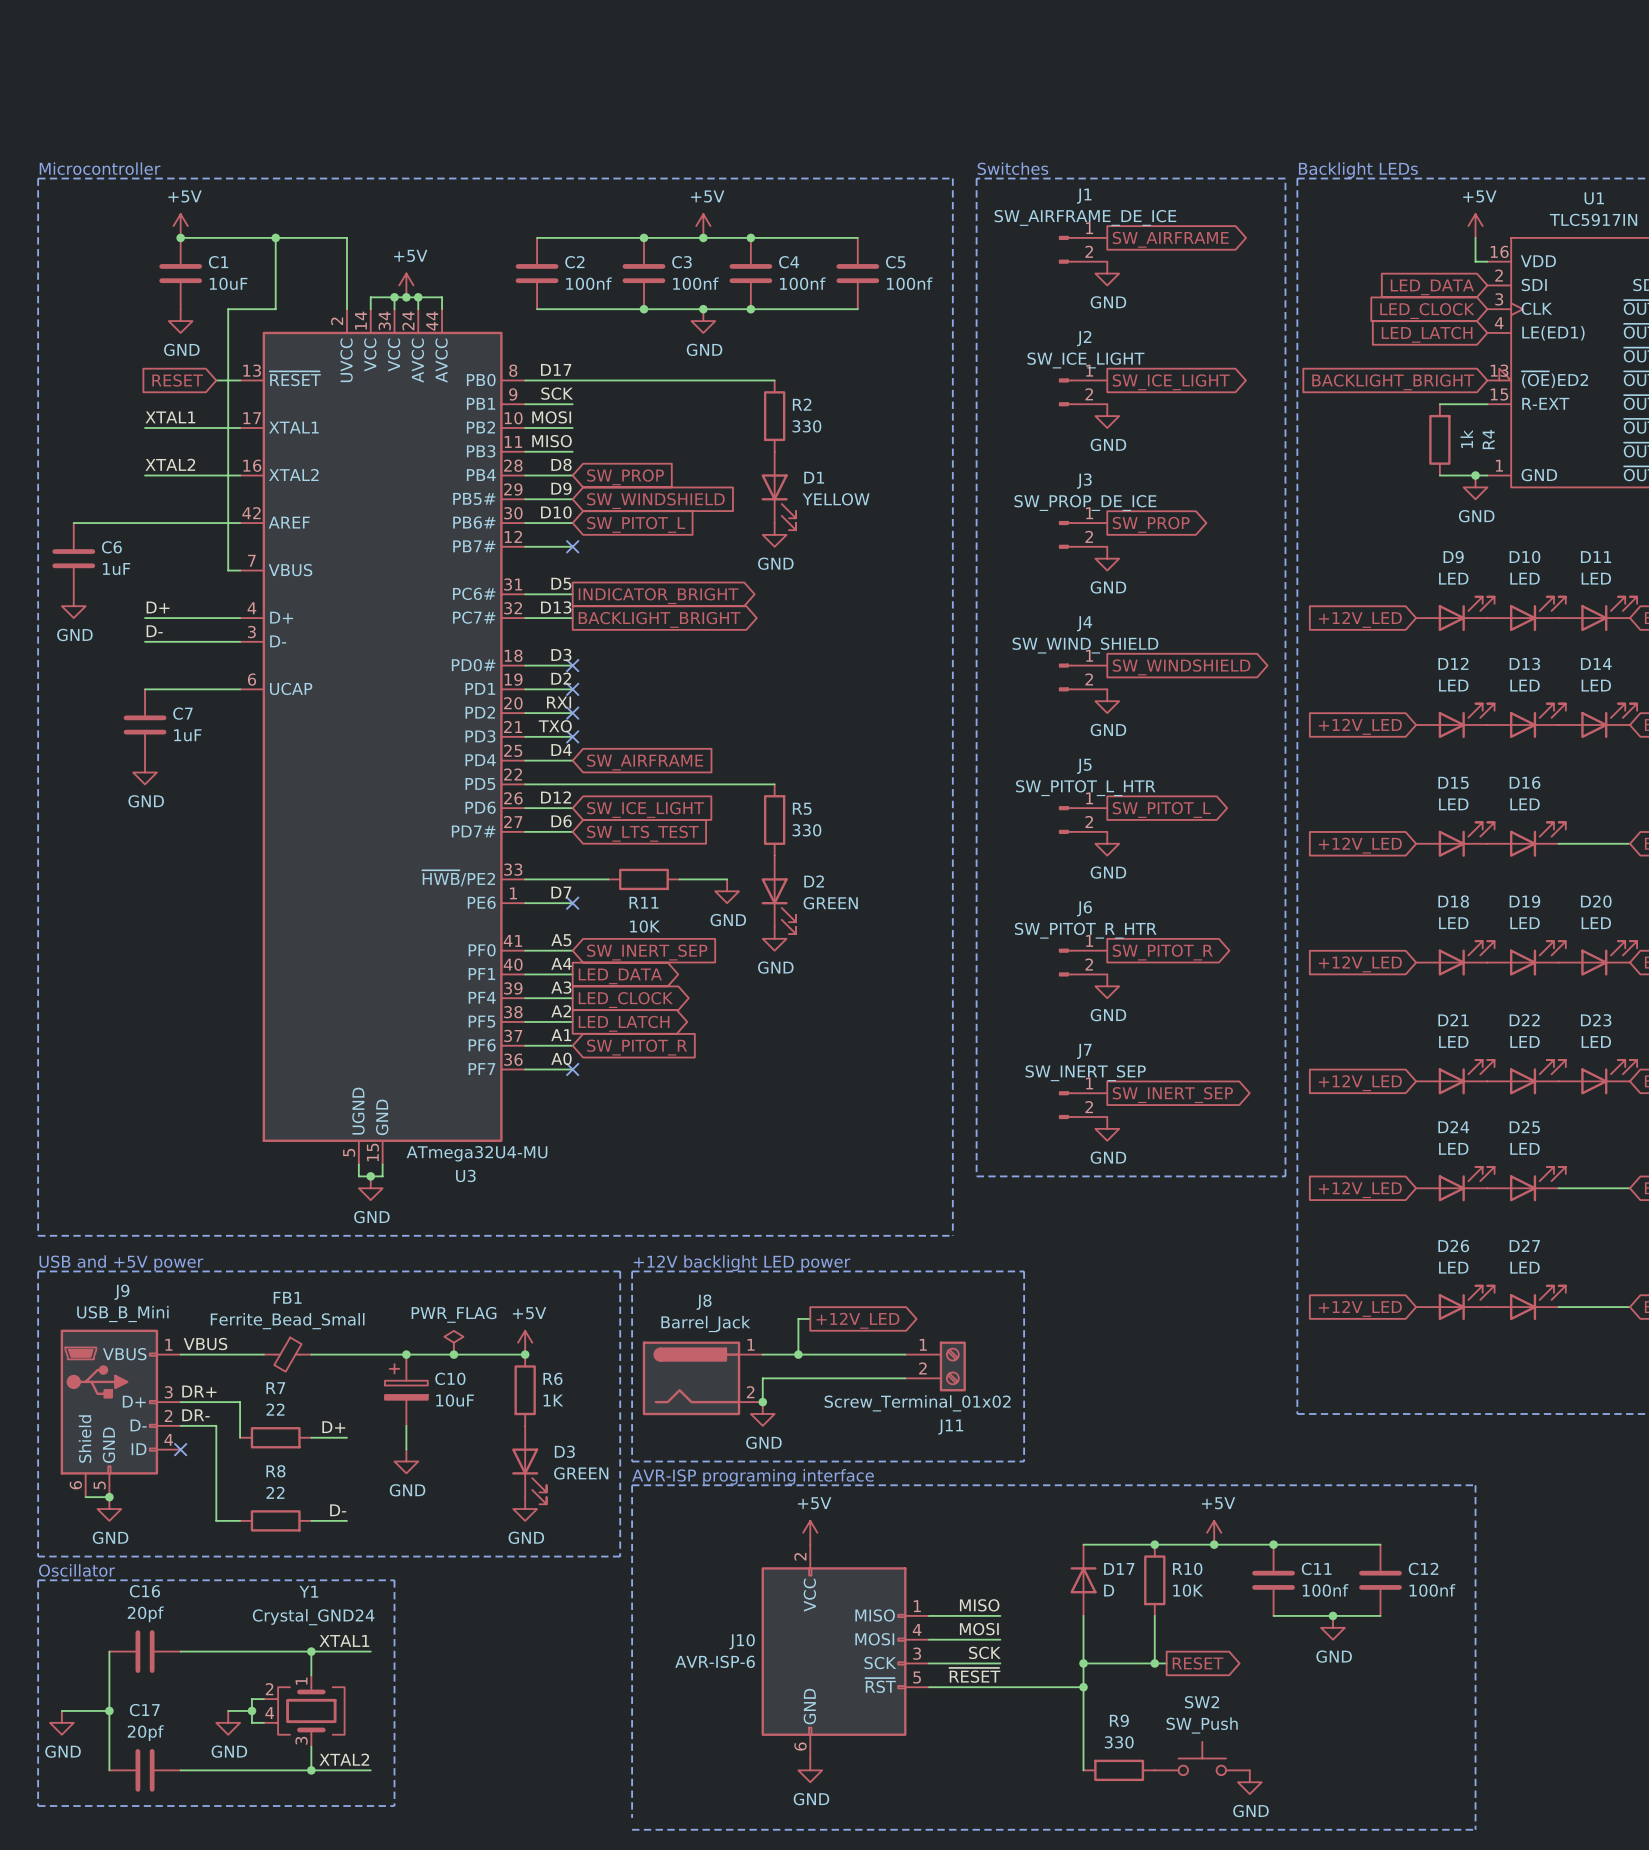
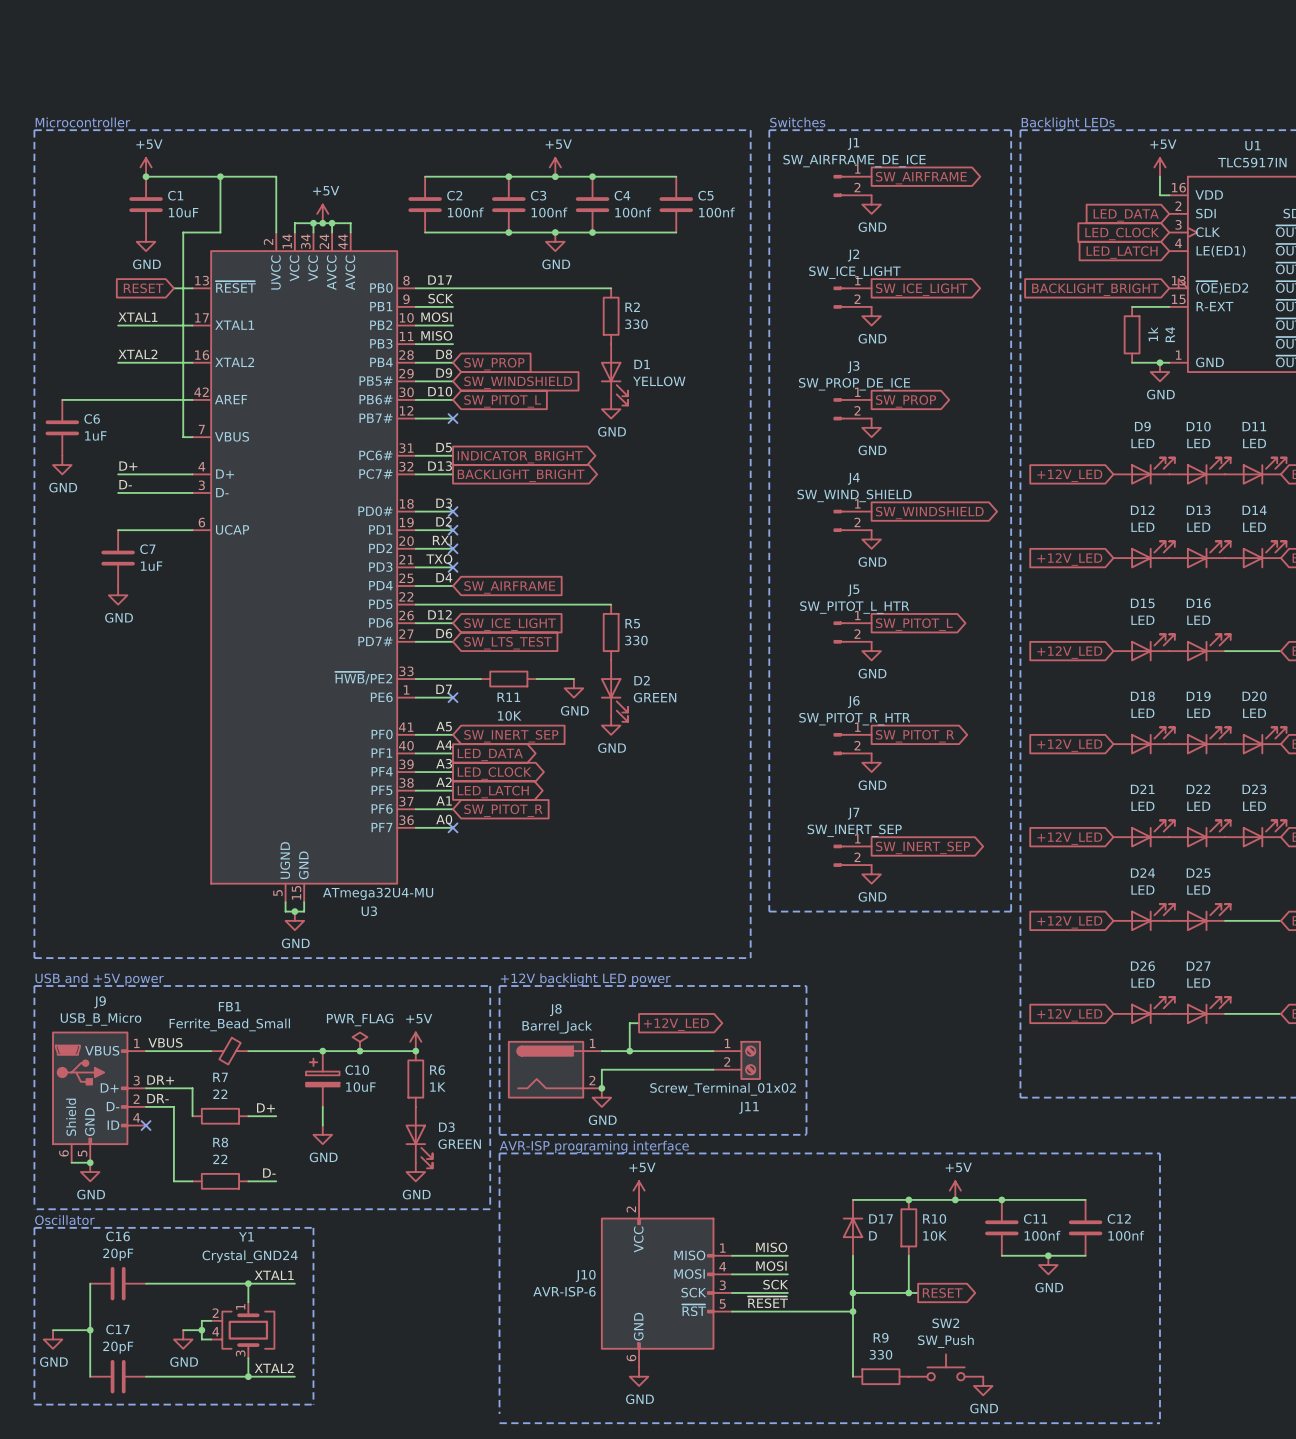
J9 value: USB_B_Mini (122, 1314) -> USB_B_Micro (101, 1019)
C16 value: 20pf (145, 1614) -> 20pF (118, 1254)
C17 value: 20pf (145, 1733) -> 20pF (118, 1347)

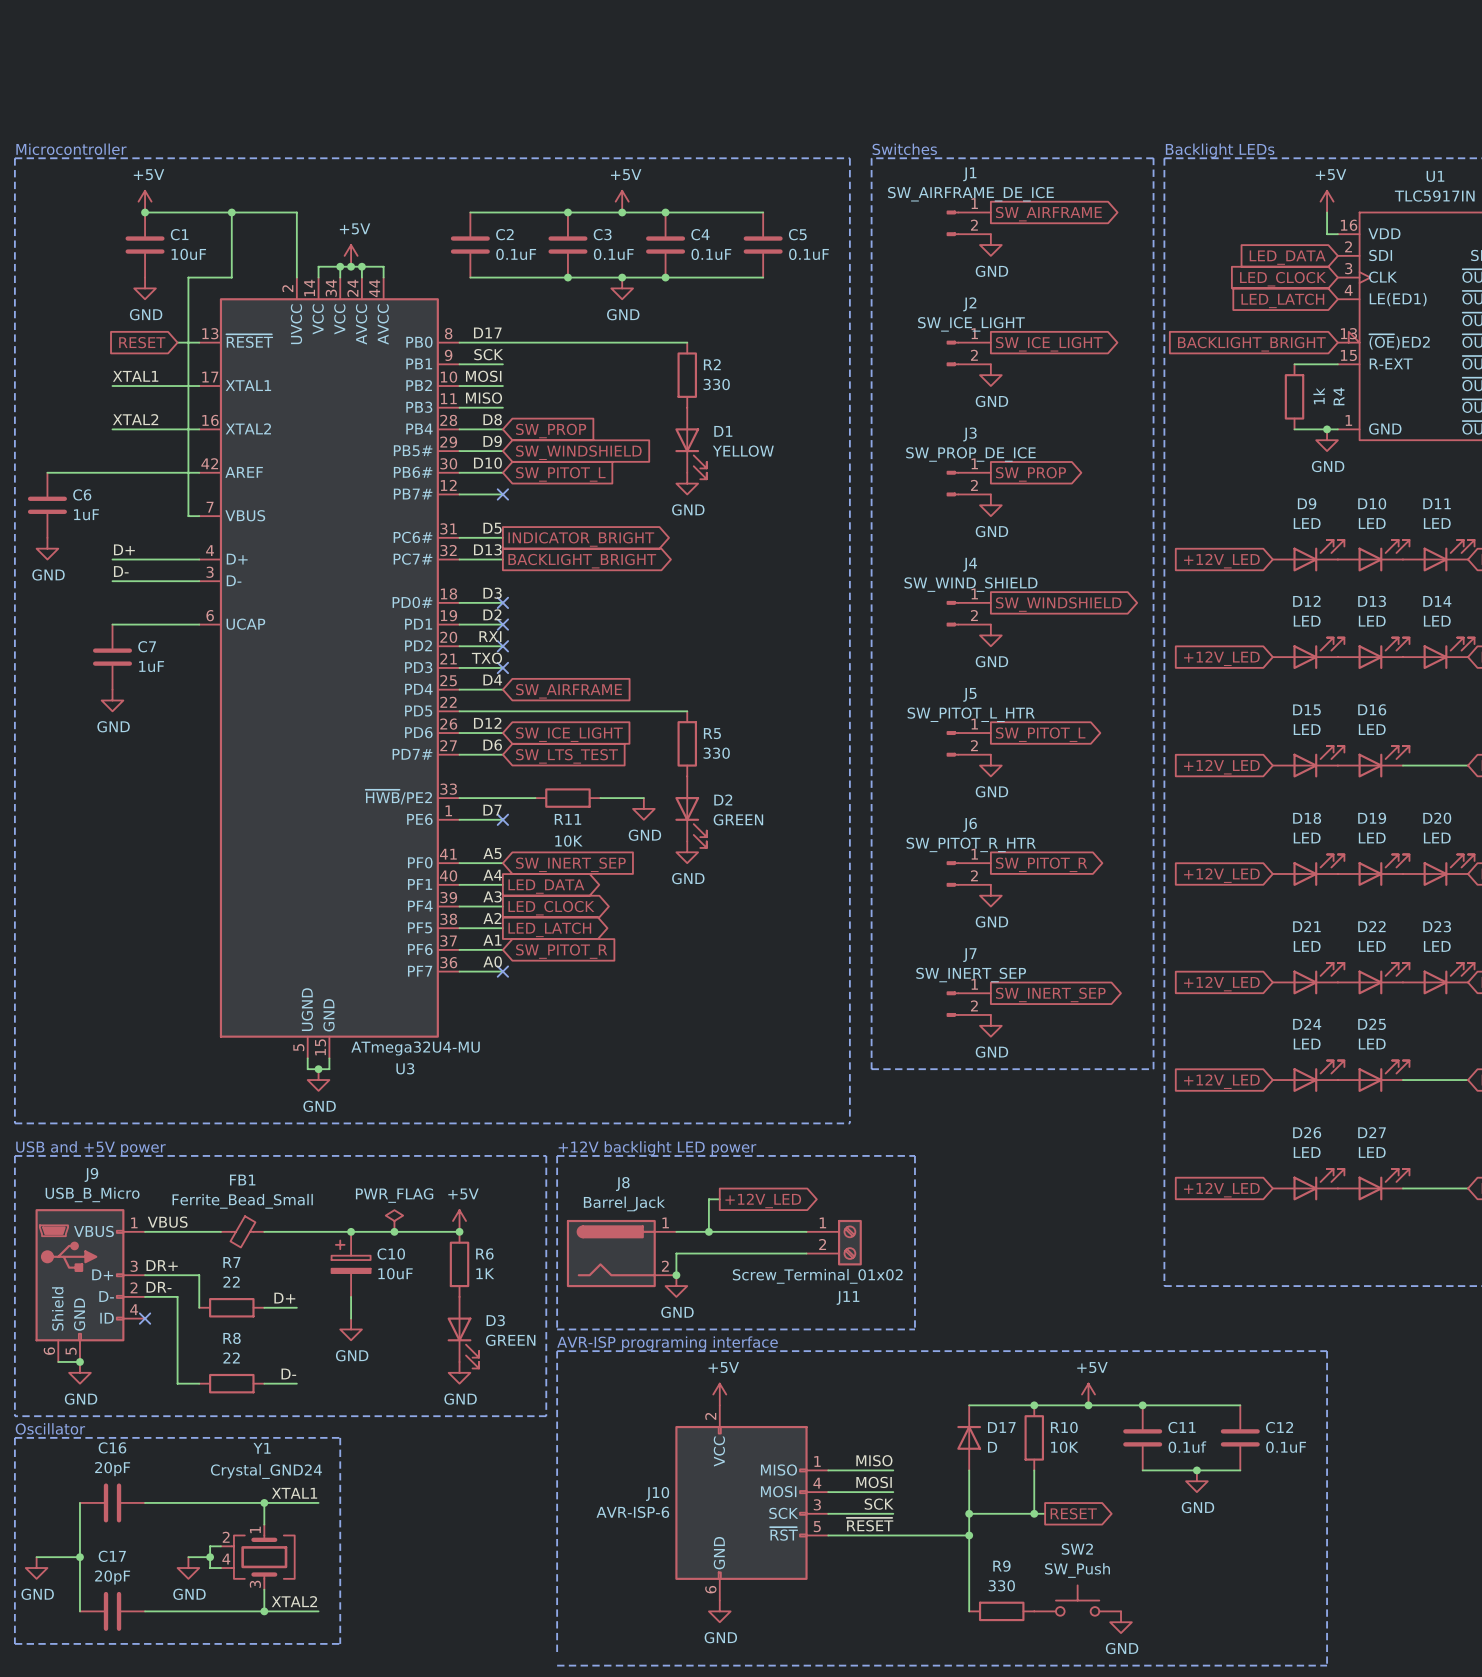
C2 value: 100nf (465, 212) -> 0.1uF (516, 254)
C3 value: 100nf (549, 212) -> 0.1uF (613, 254)
C4 value: 100nf (633, 212) -> 0.1uF (711, 254)
C5 value: 100nf (716, 212) -> 0.1uF (808, 254)
C11 value: 100nf (1042, 1235) -> 0.1uf (1187, 1447)
C12 value: 100nf (1126, 1235) -> 0.1uF (1286, 1447)

